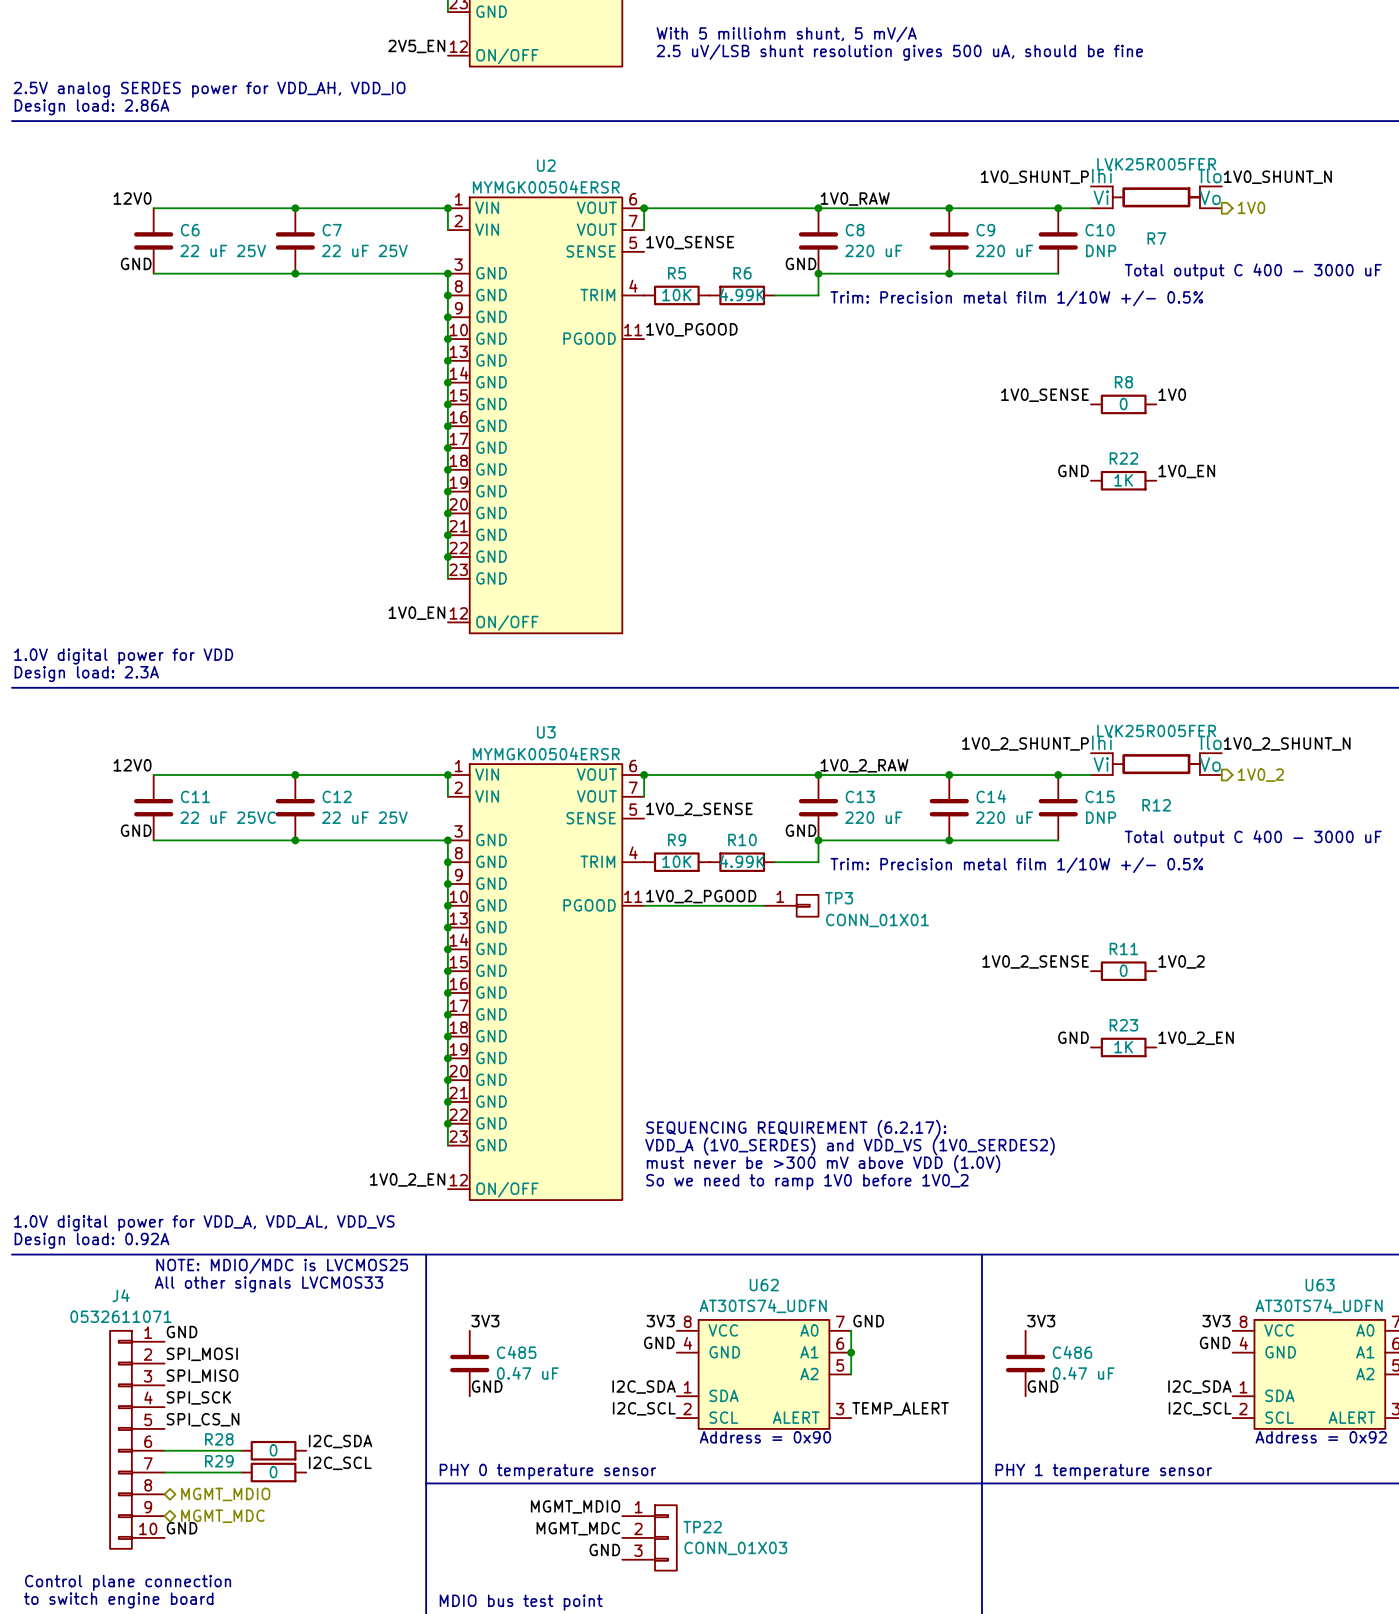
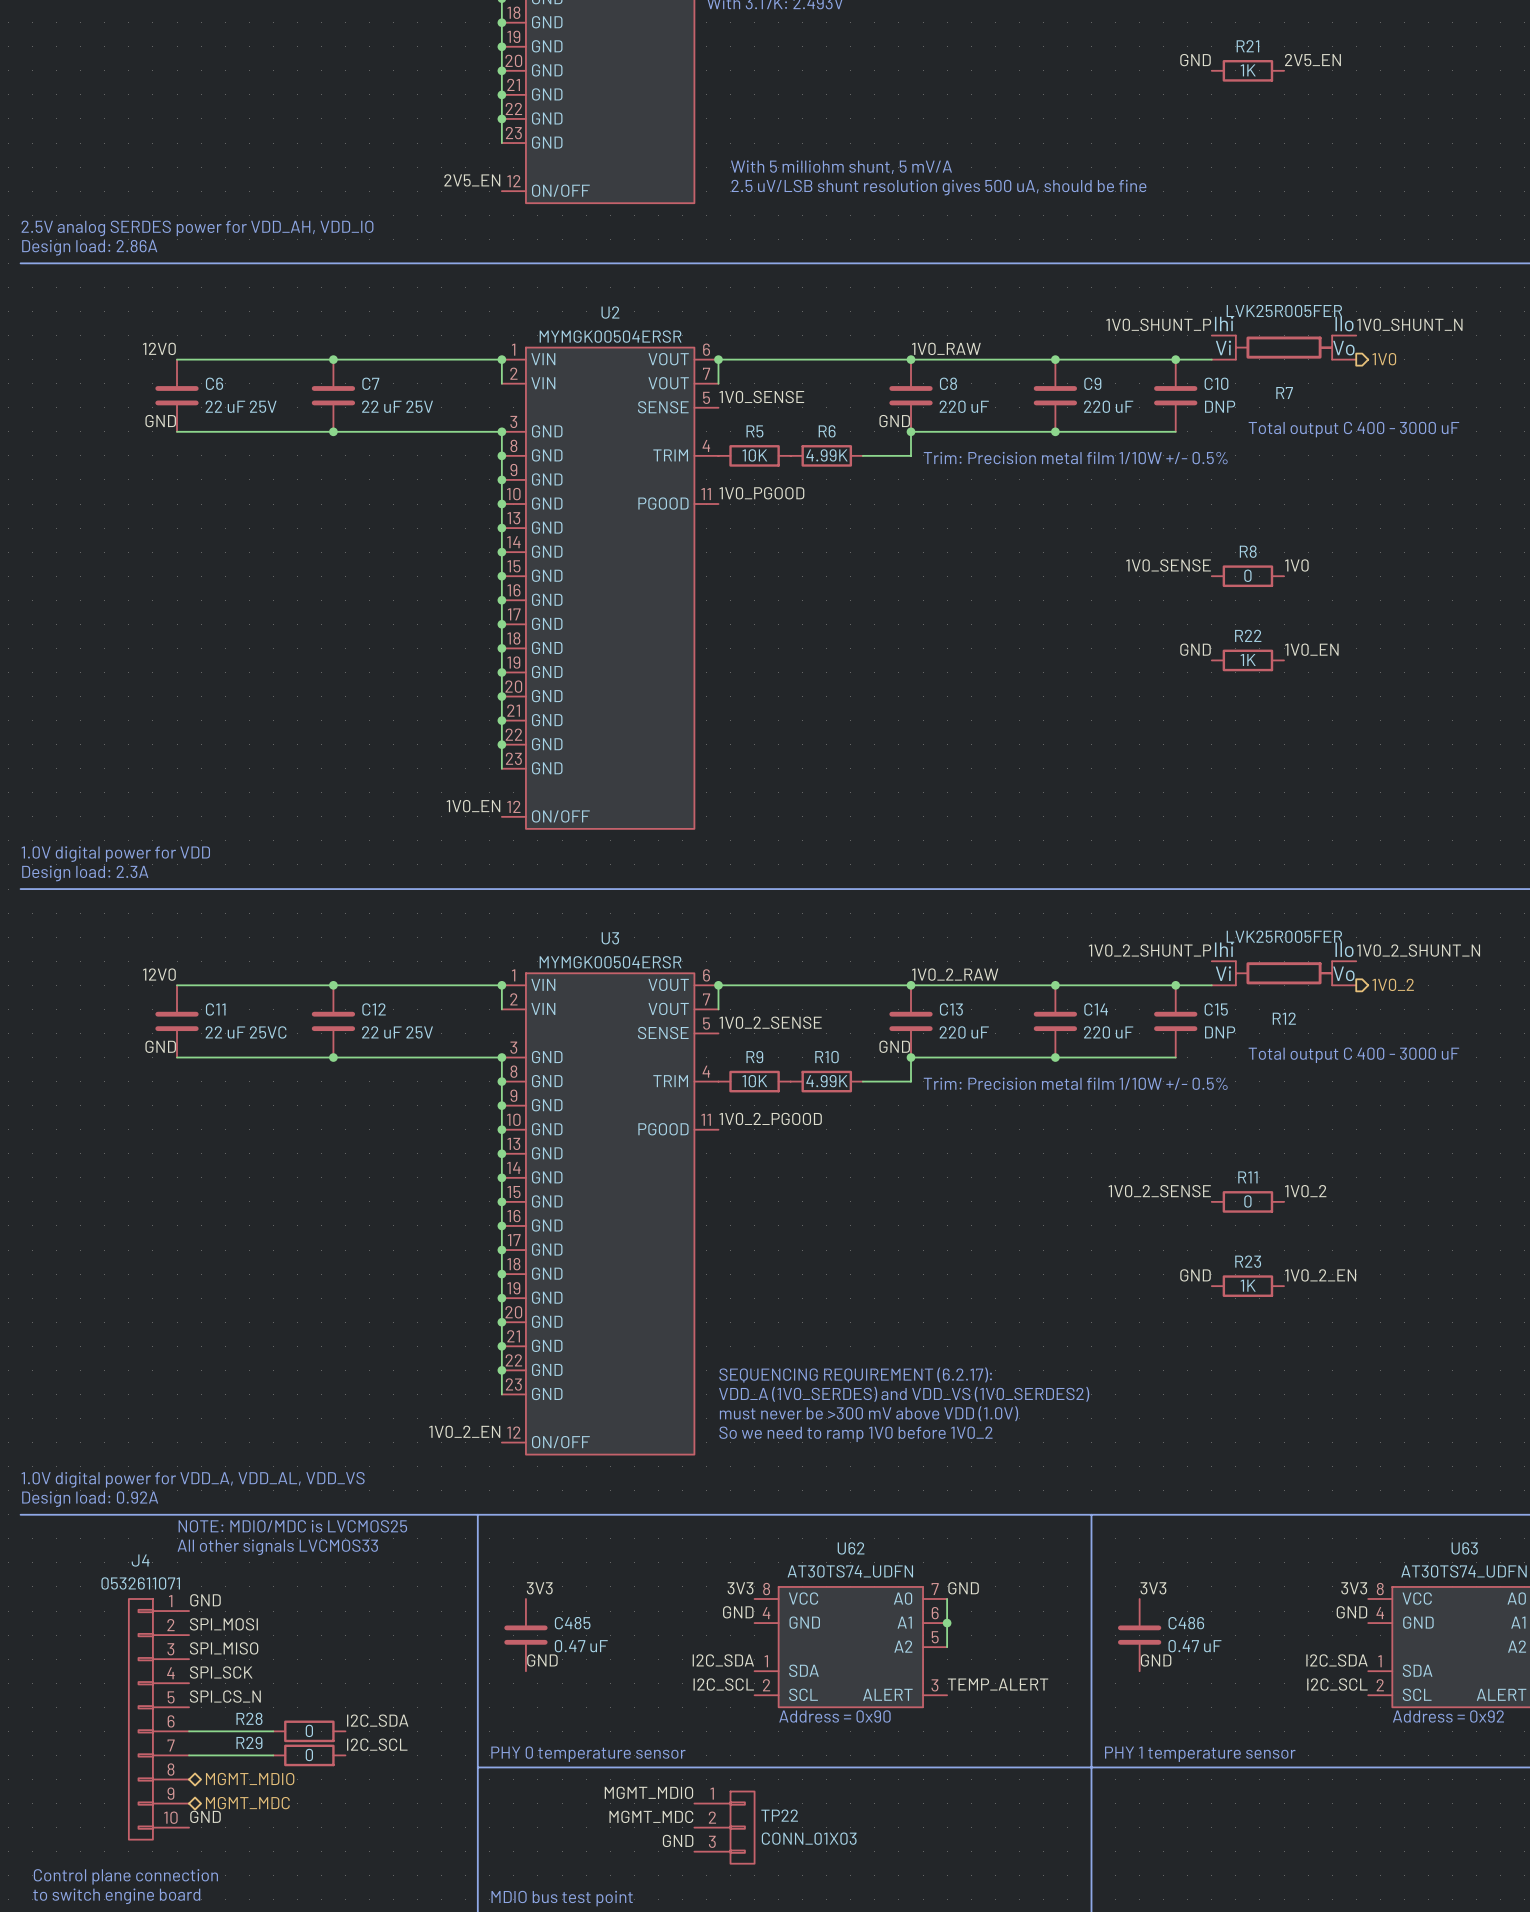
wire: (644, 905) (764, 905) -> none
TP3: CONN_01X01 (791, 905) -> none

